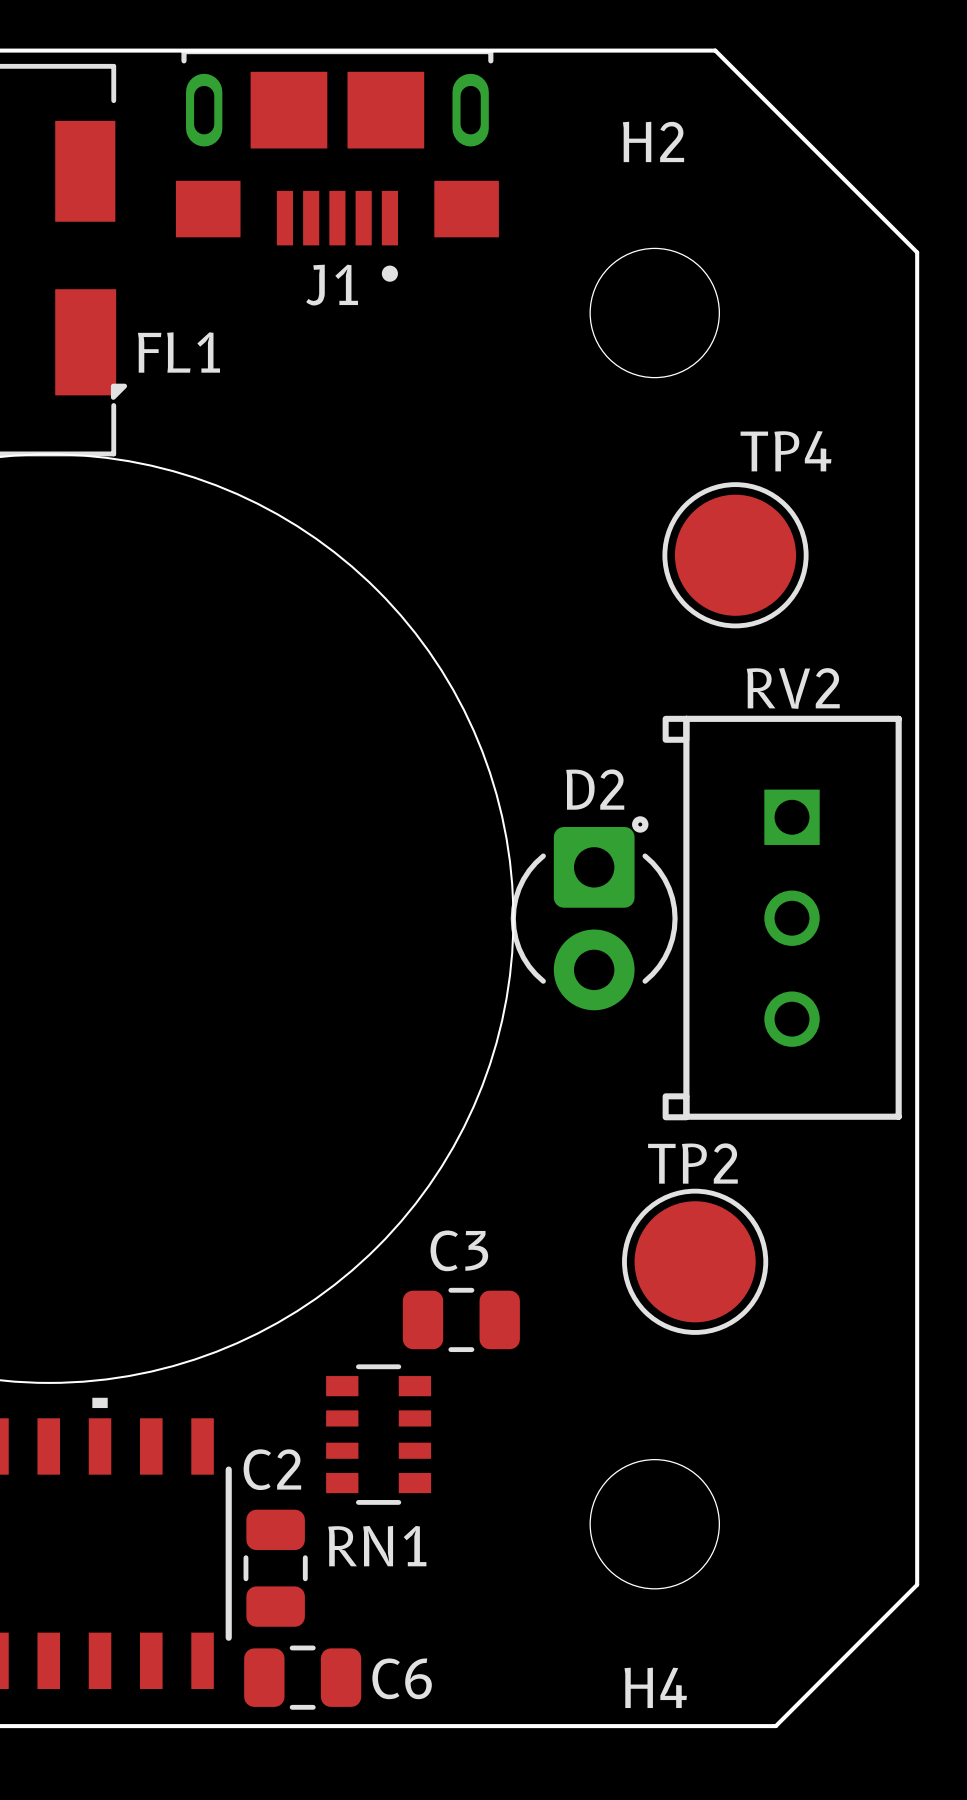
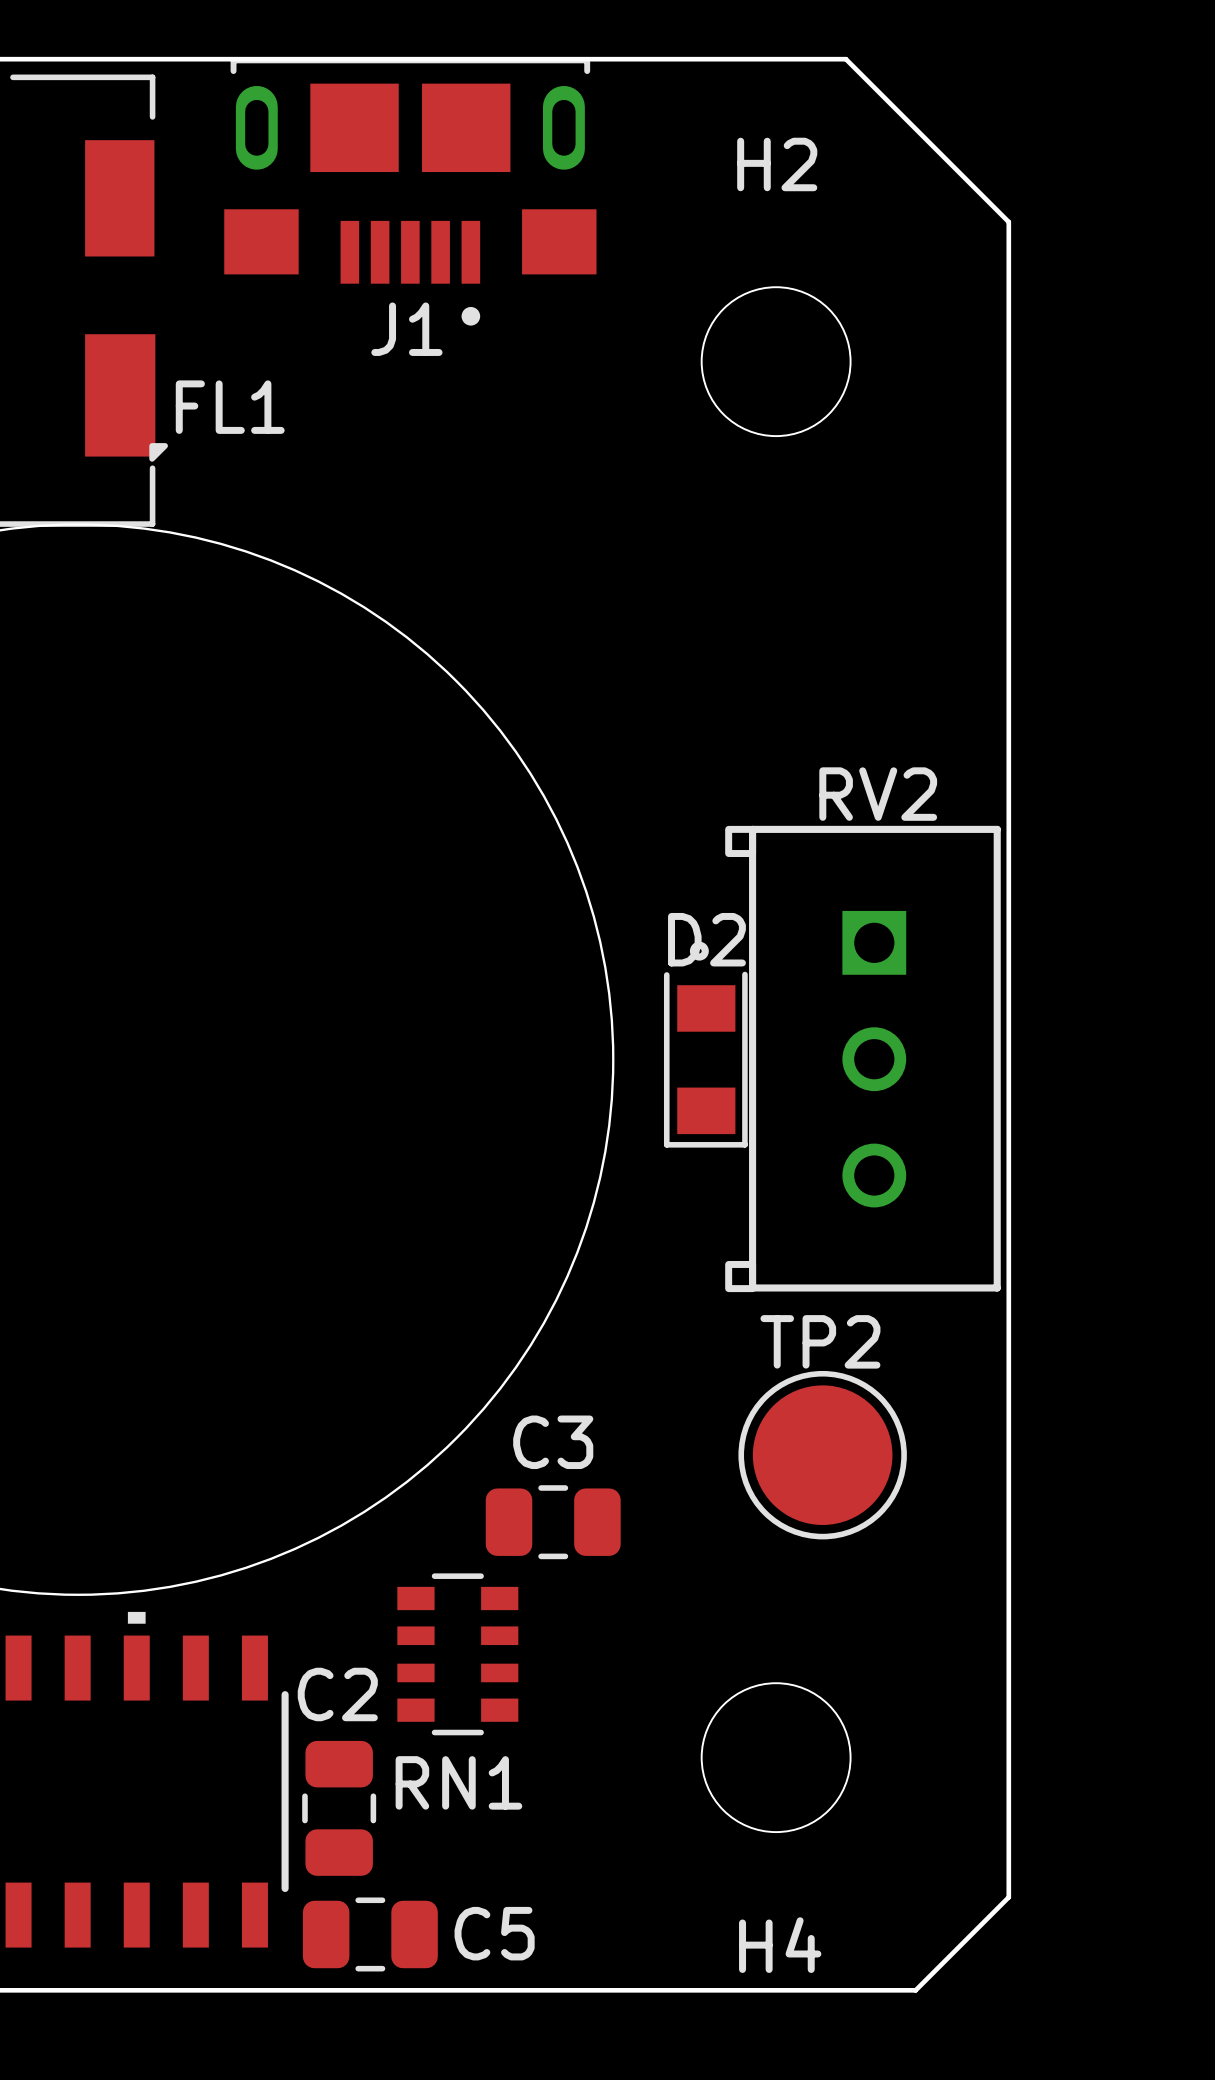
board edge: (856, 191) (917, 252) (917, 1584) (856, 1645) -> (1008, 222) (1008, 1897)
TP4: (735, 555) -> none
D2 footprint: [510, 826, 678, 1011] -> [663, 971, 748, 1148]
RV2 position: (766, 918) -> (845, 1058)
C6 name: C6 (402, 1678) -> C5 (494, 1933)

